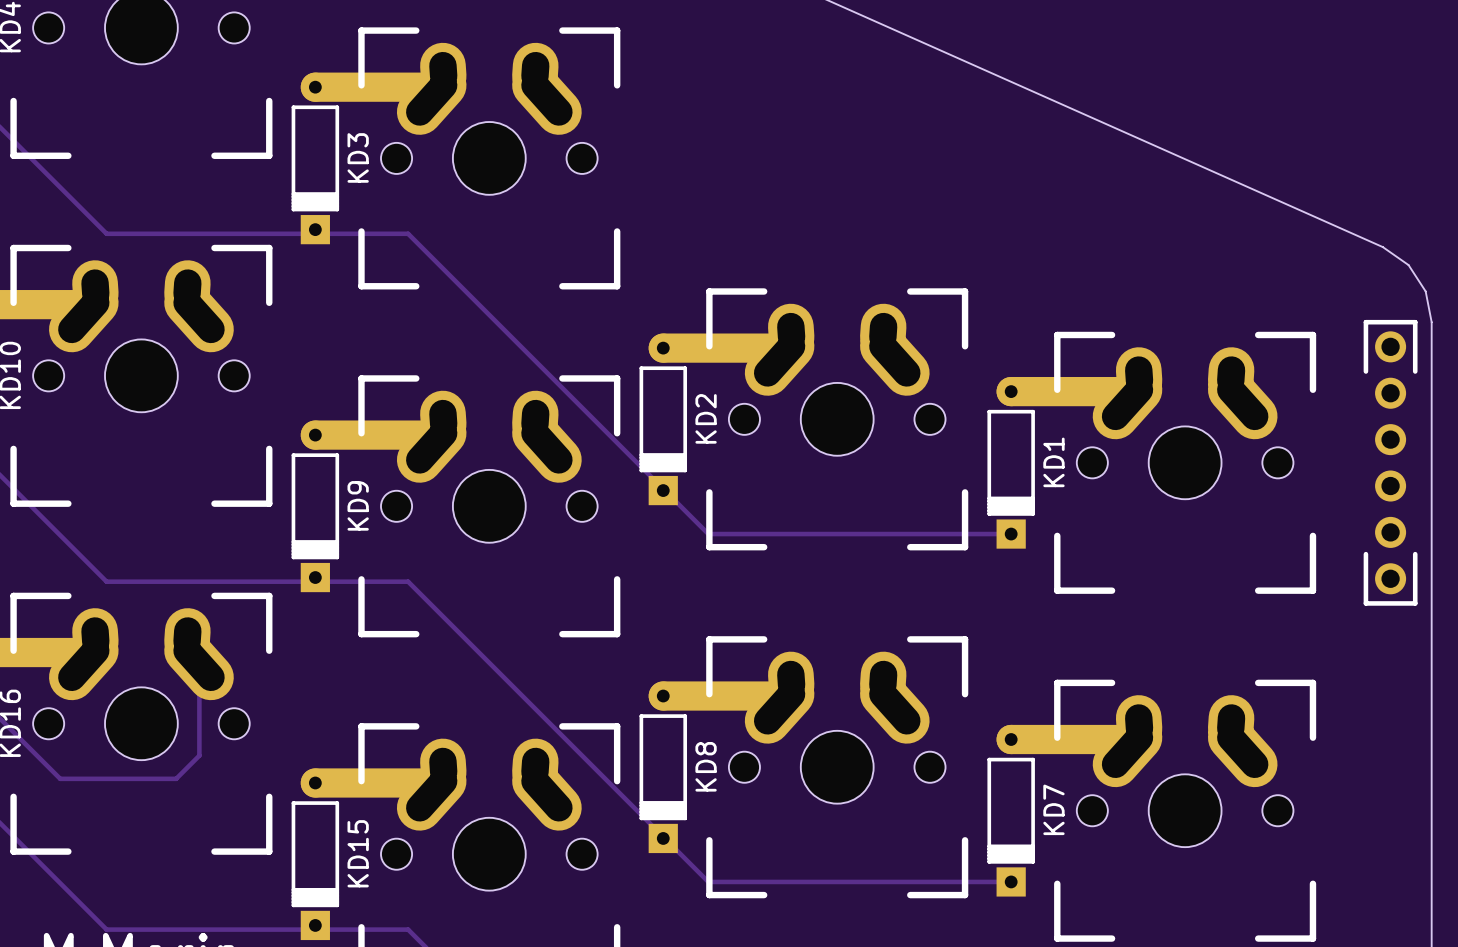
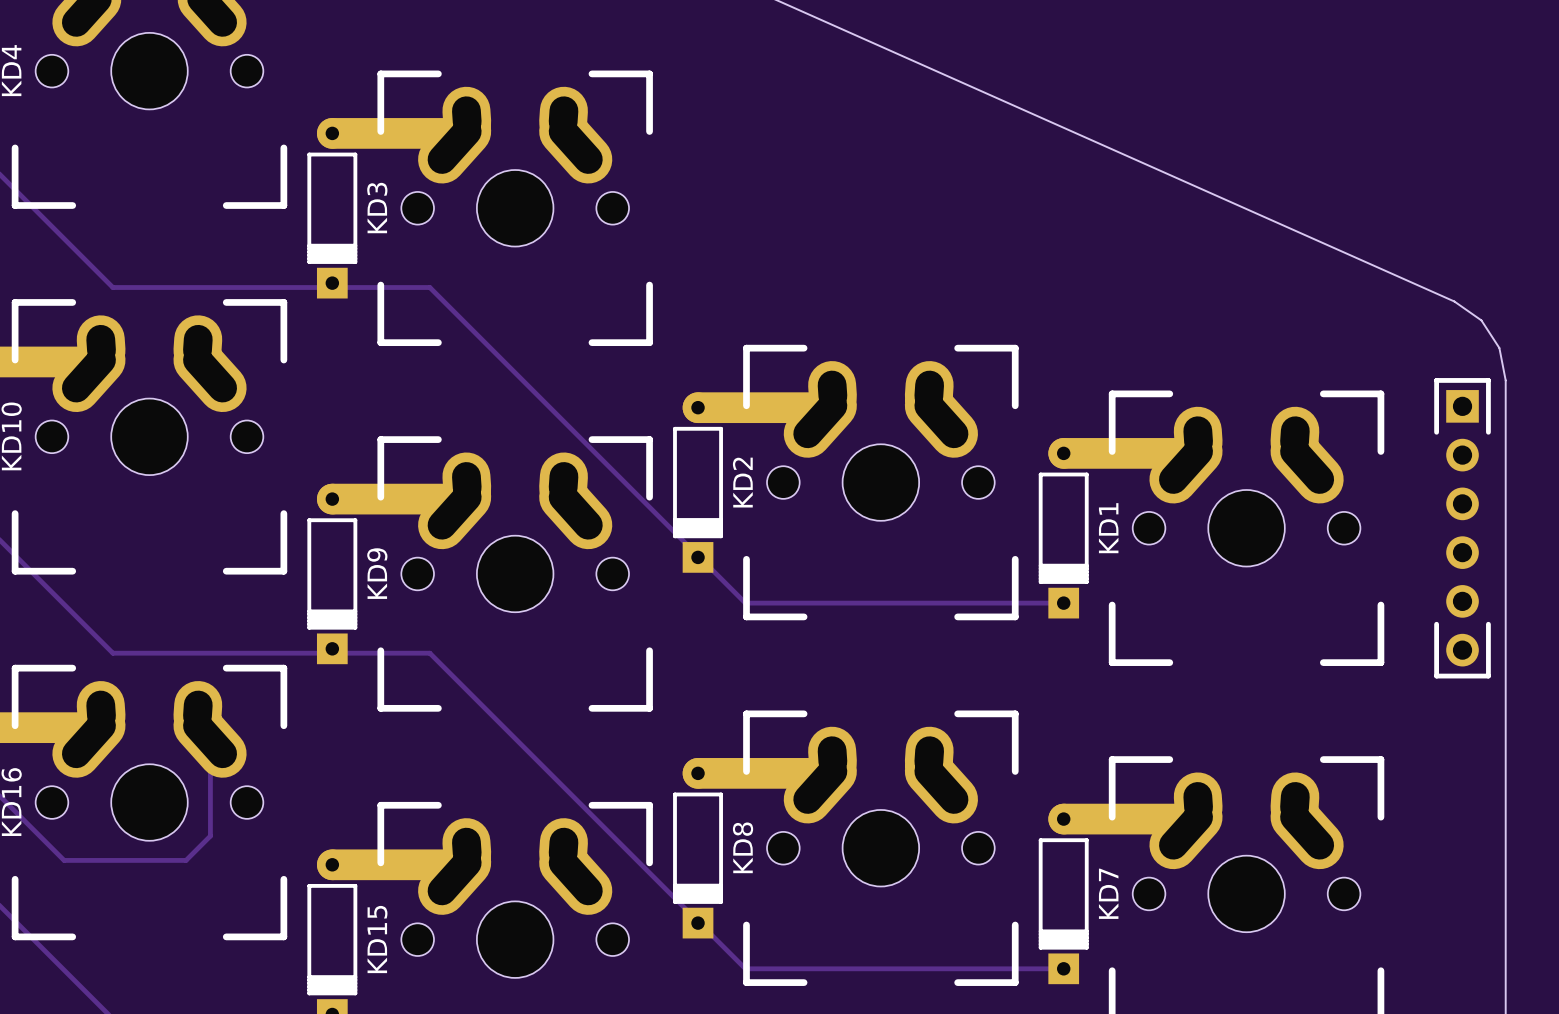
part footprint: [1363, 319, 1418, 606] -> [1434, 378, 1491, 679]

